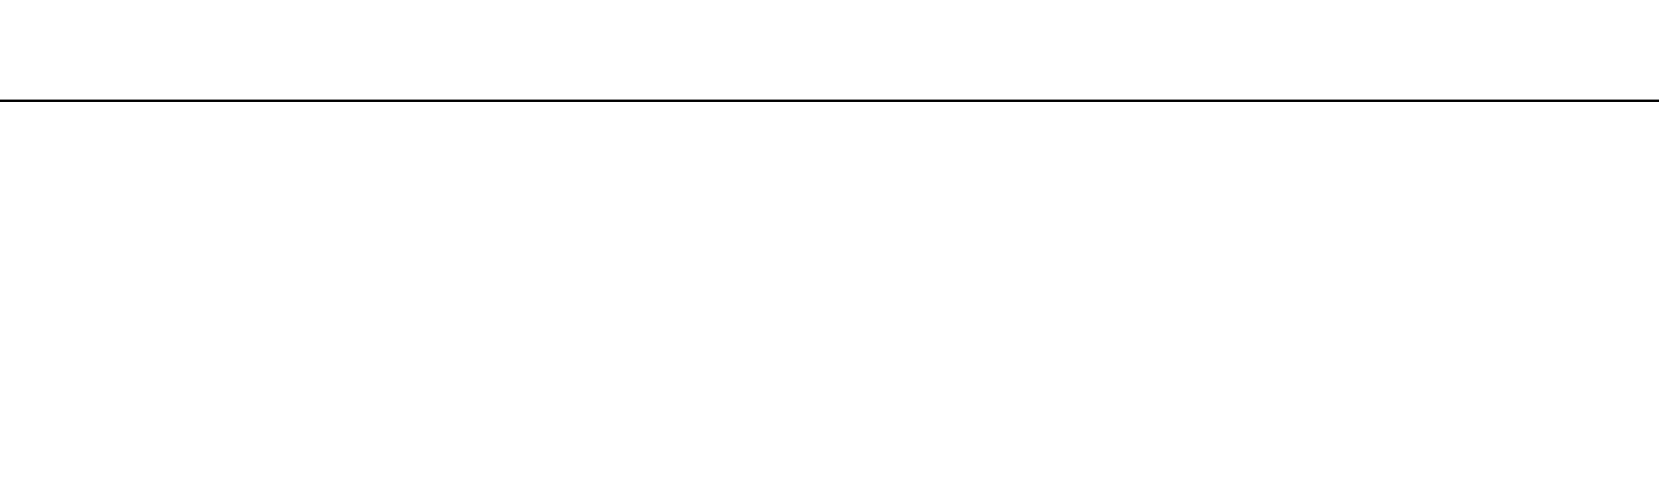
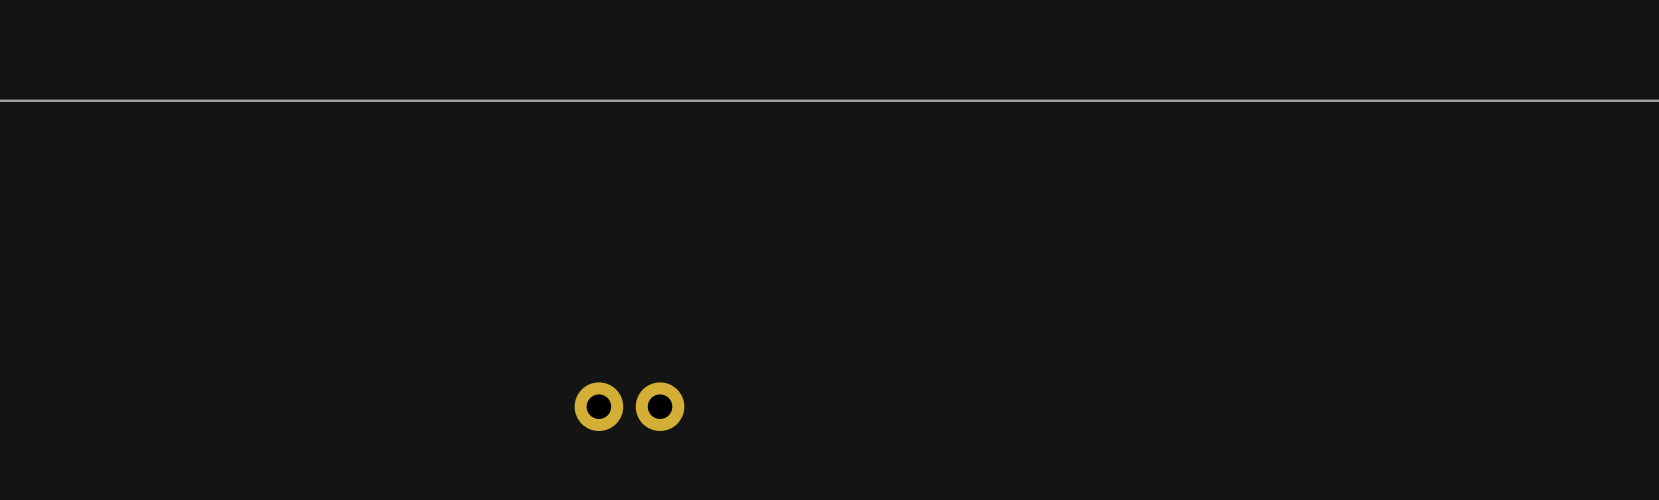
part: none -> (629, 406)

